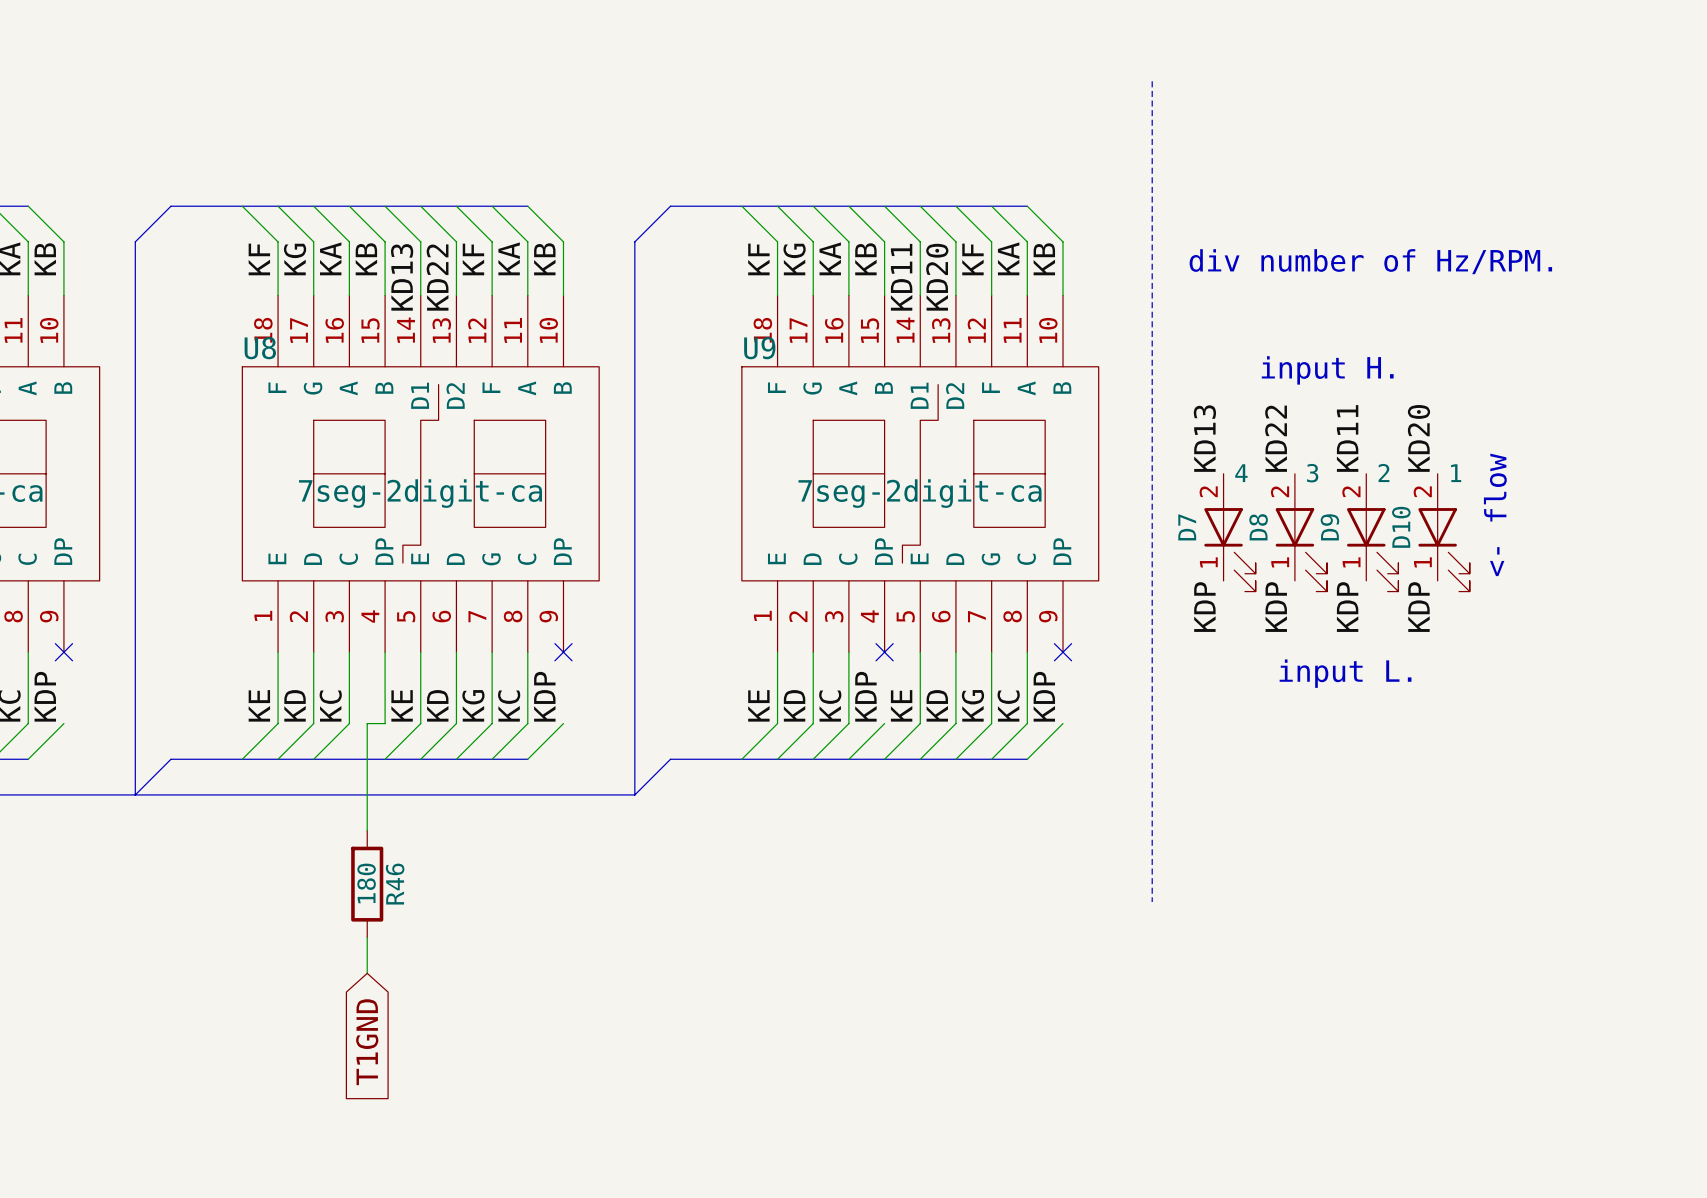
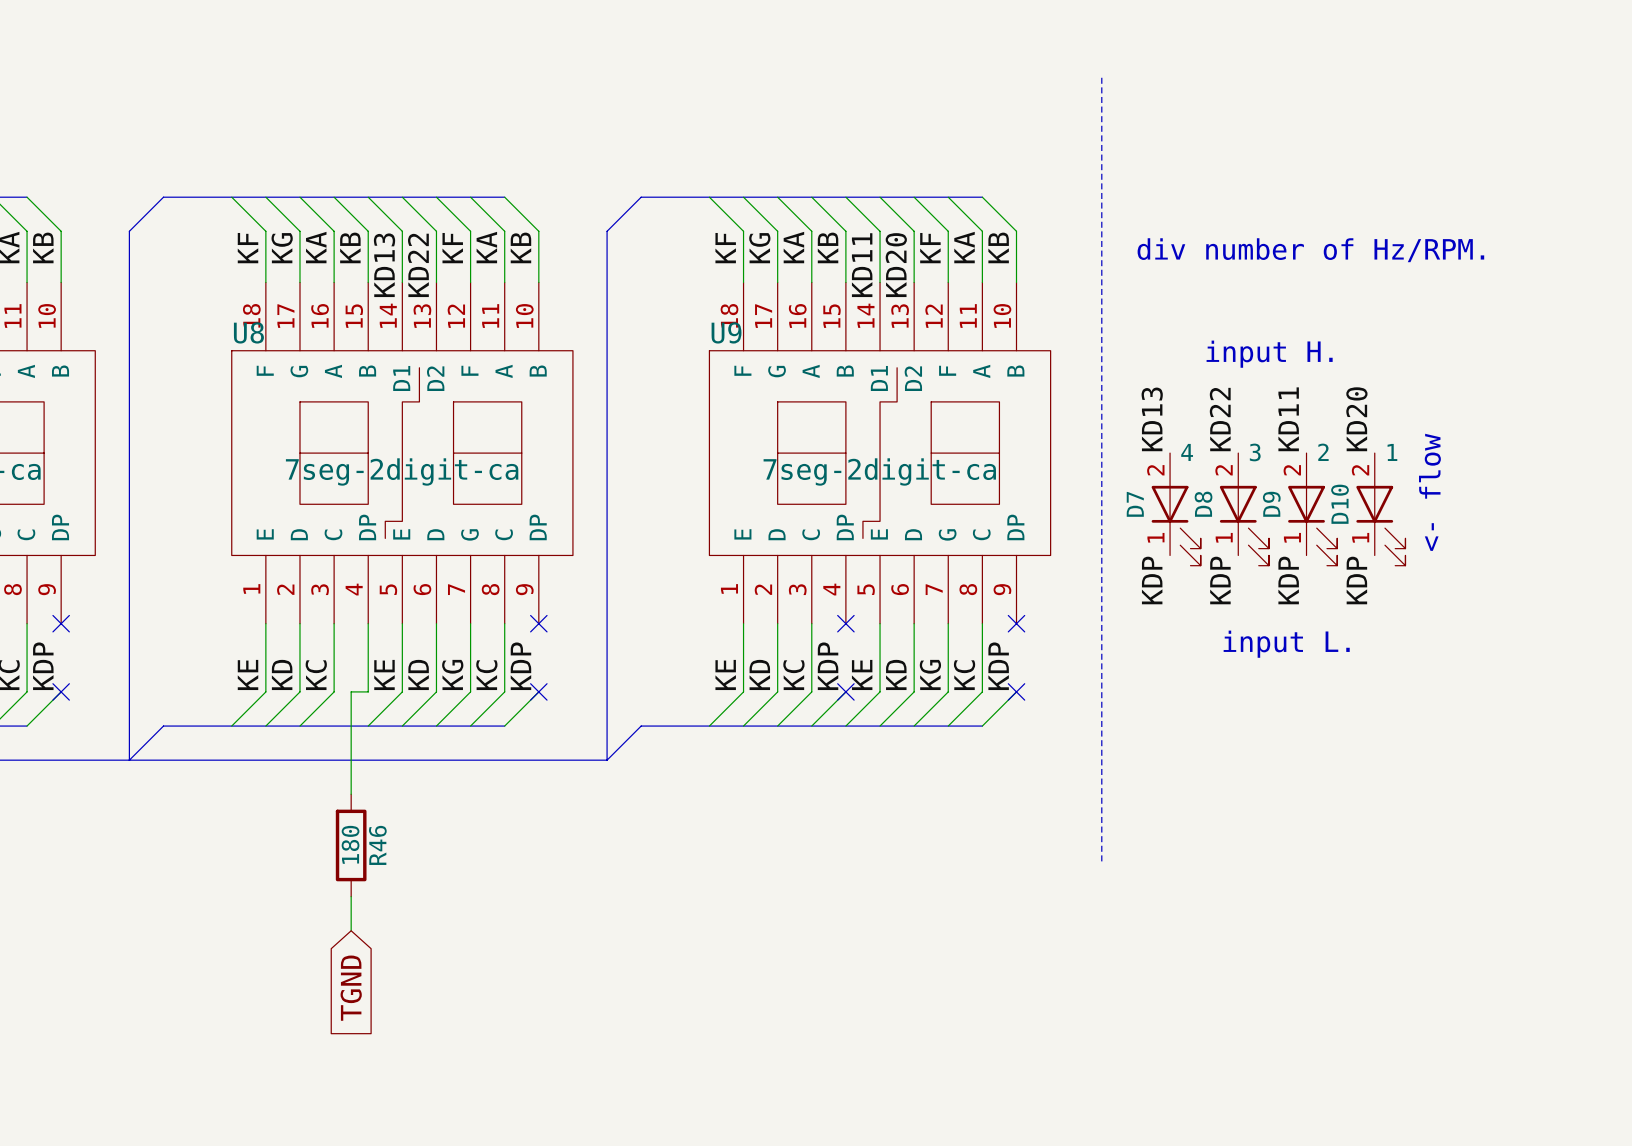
no-connect mark: none -> (61, 691)
no-connect mark: none -> (538, 691)
no-connect mark: none -> (845, 691)
no-connect mark: none -> (1016, 691)
global label: T1GND (367, 1042) -> TGND (351, 988)

